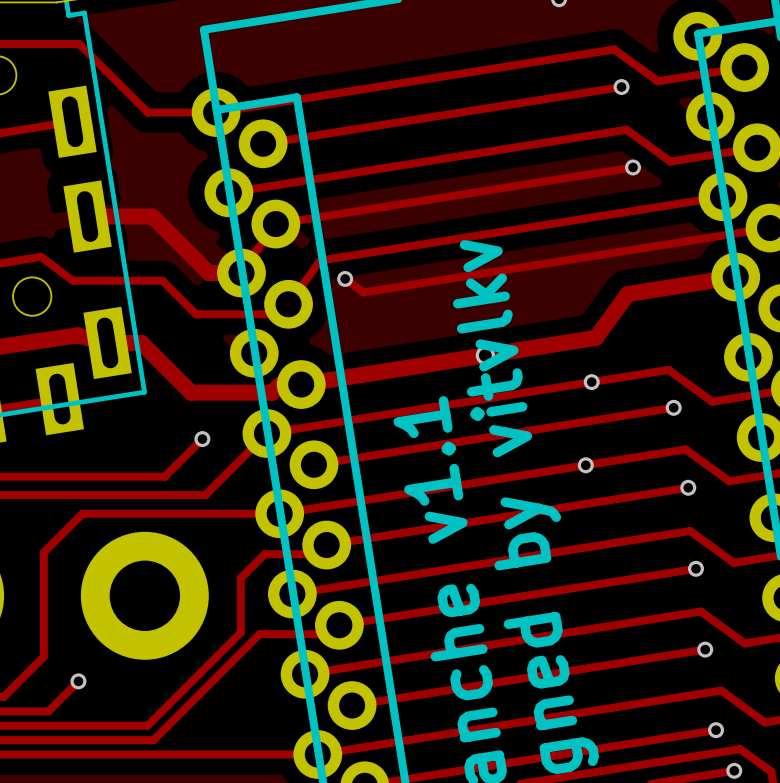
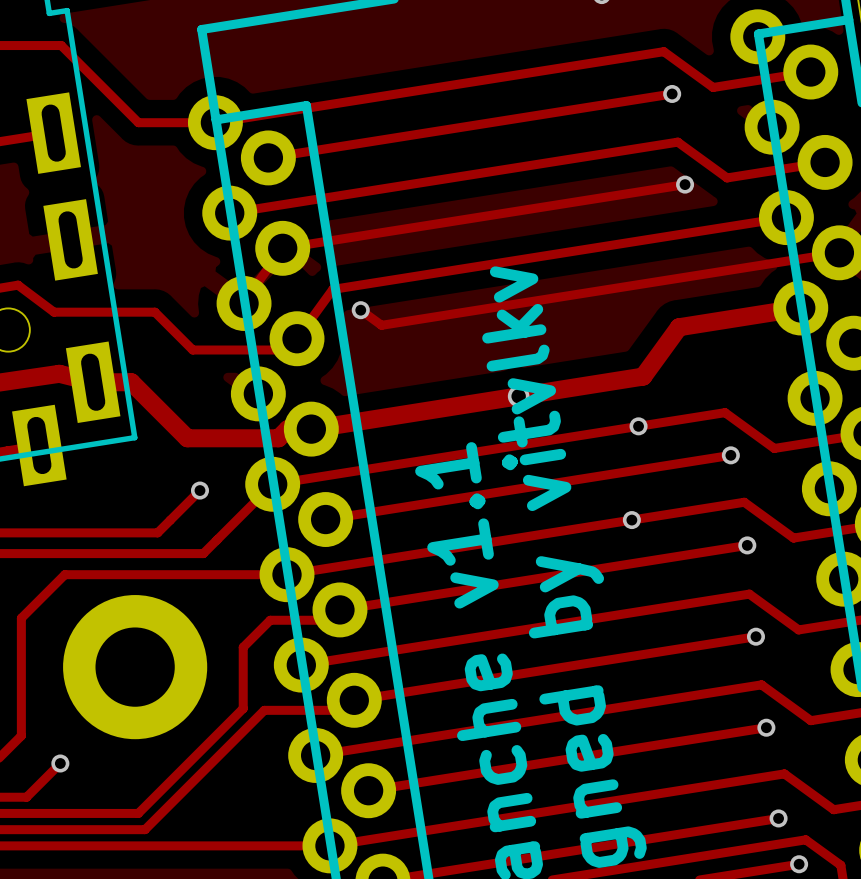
track: (87, 216) (152, 216) (209, 273) (241, 273) -> none

